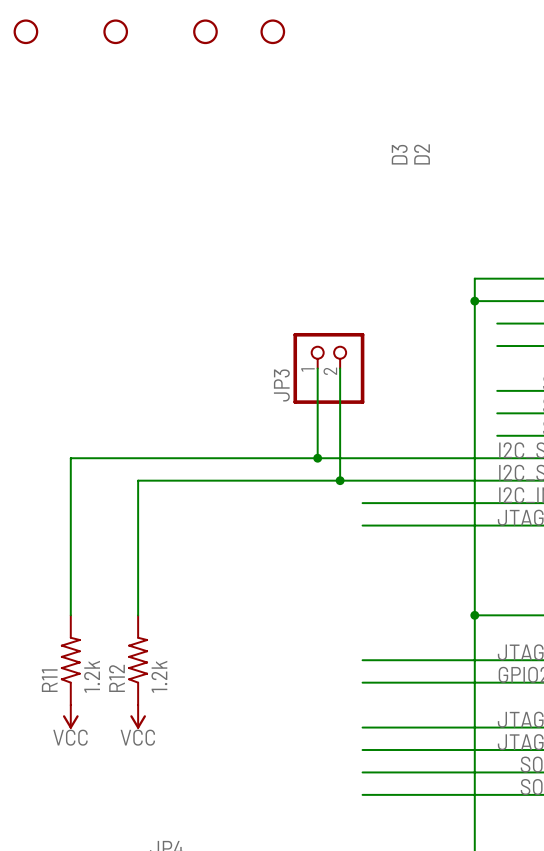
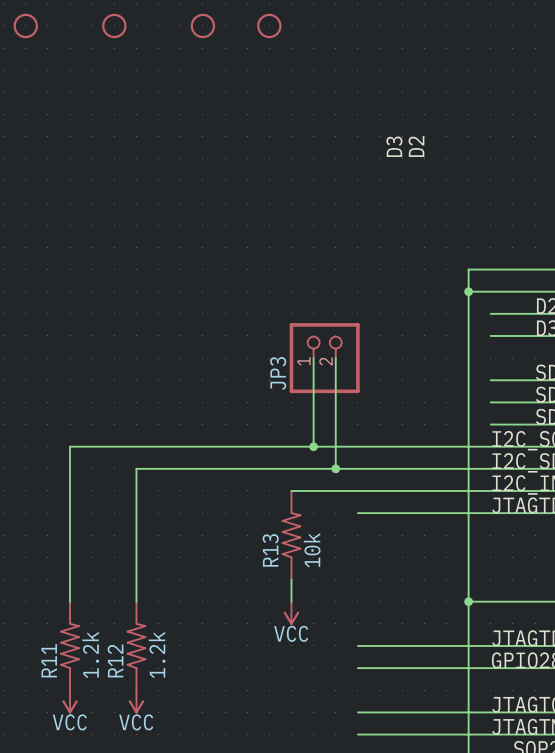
wire: none -> (291, 490) (357, 490)
R13: none -> 10k (291, 535)
wire: none -> (291, 579) (291, 601)
power symbol: none -> VCC (291, 613)

